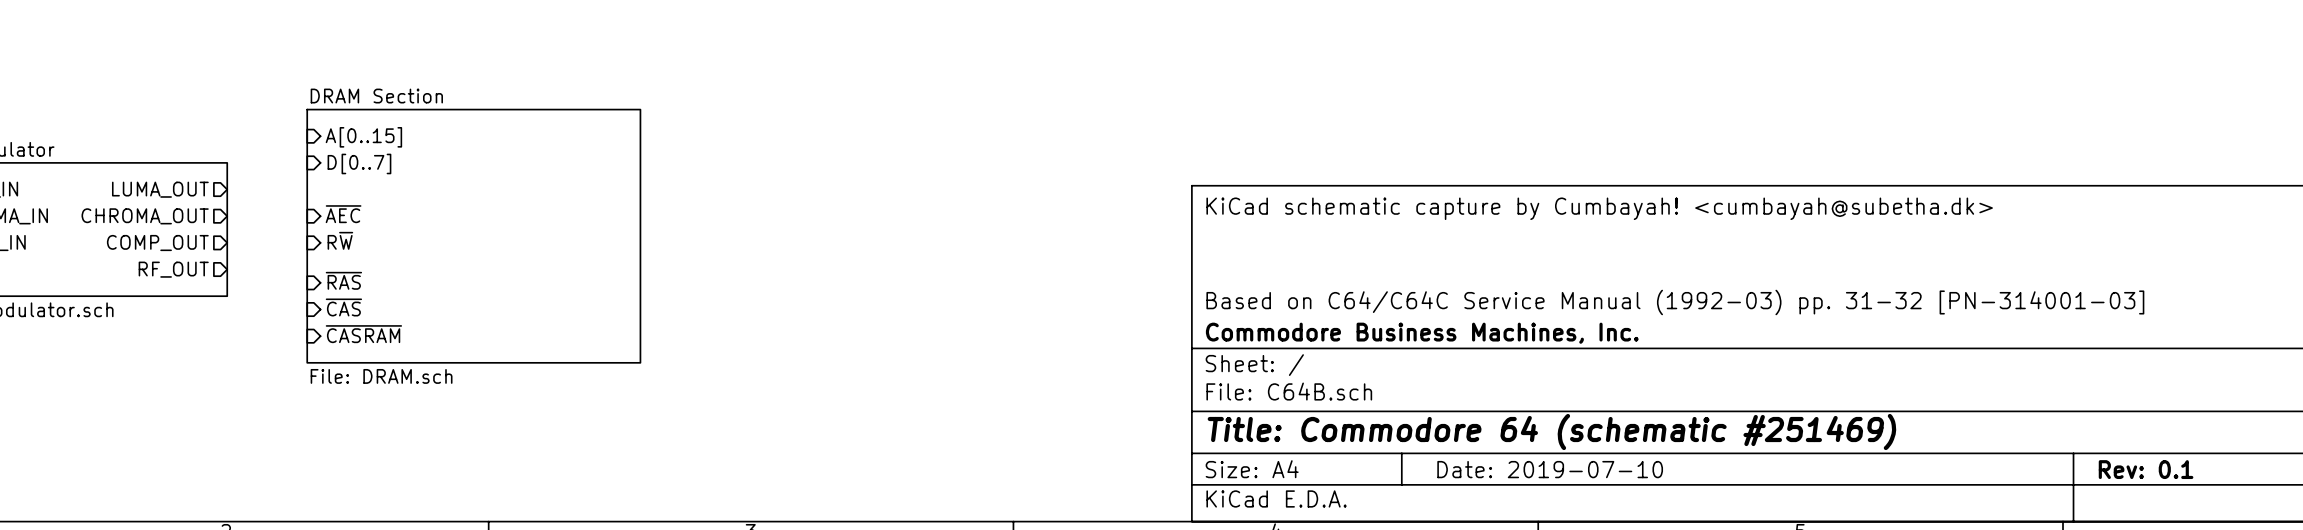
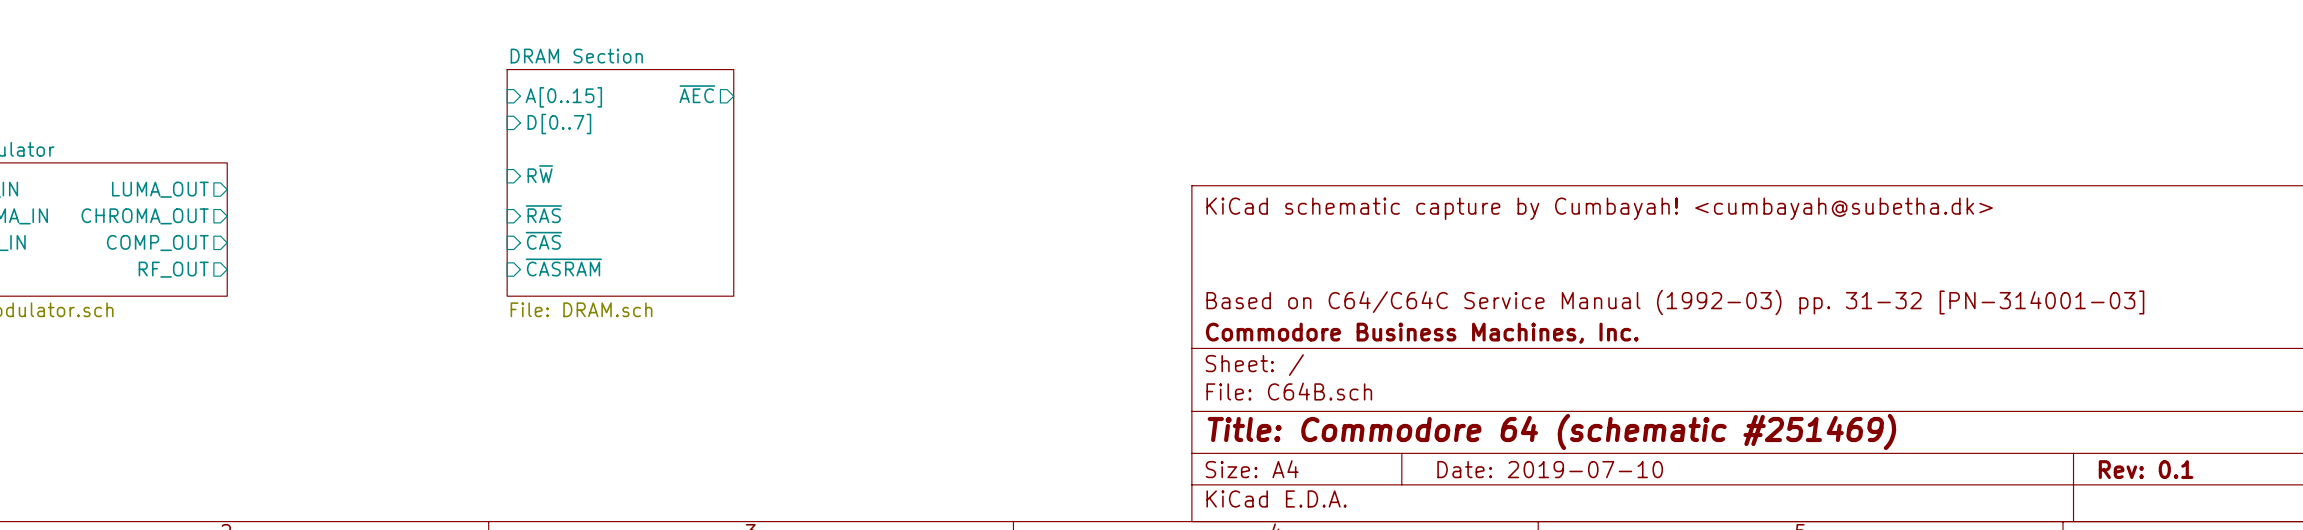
sheet pin: none -> ~{AEC} (697, 94)
sheet pin position: A[0..15] (363, 137) -> A[0..15] (563, 97)
sheet pin position: D[0..7] (359, 163) -> D[0..7] (559, 123)
sheet DRAM Section: none -> File: DRAM.sch (620, 182)
sheet pin: ~{AEC} (343, 214) -> none
sheet DRAM Section: File: DRAM.sch (473, 236) -> none
sheet pin position: R~{W} (340, 240) -> R~{W} (540, 174)
sheet pin position: ~{RAS} (343, 280) -> ~{RAS} (543, 214)
sheet pin position: ~{CAS} (343, 307) -> ~{CAS} (543, 240)
sheet pin position: ~{CASRAM} (363, 334) -> ~{CASRAM} (563, 267)

